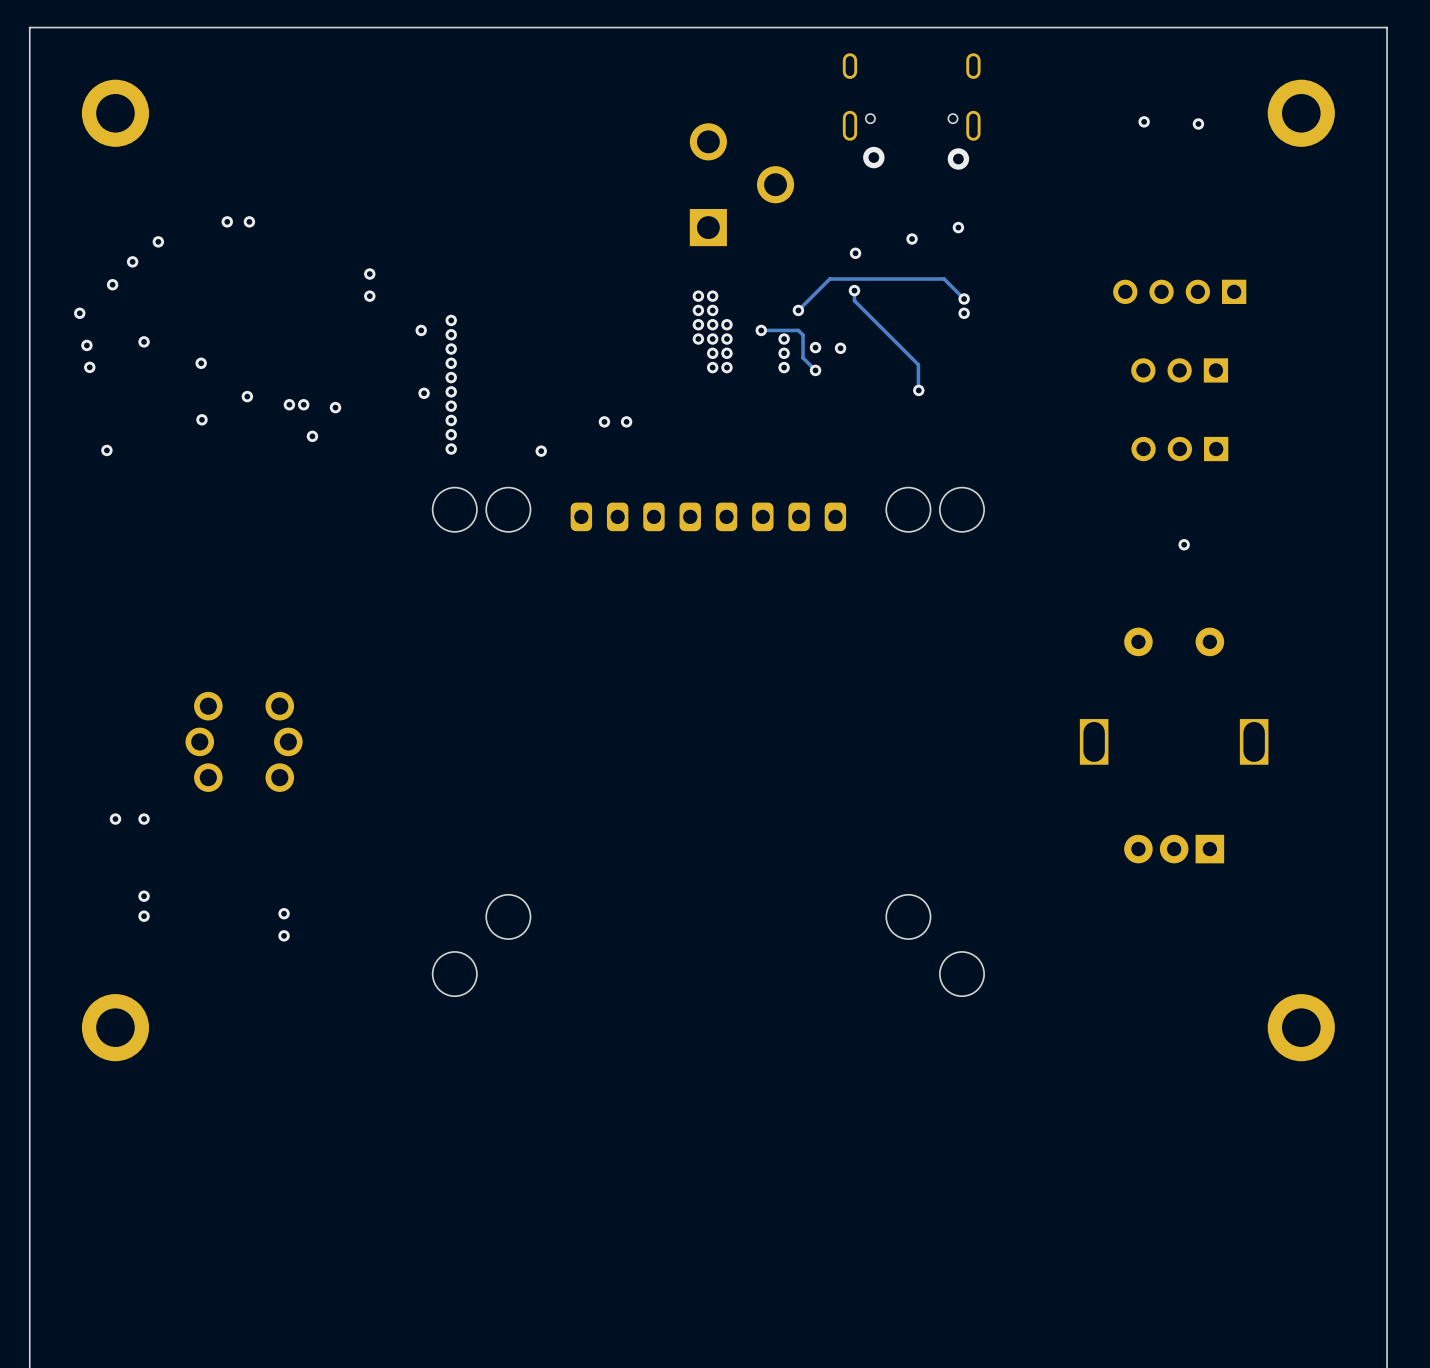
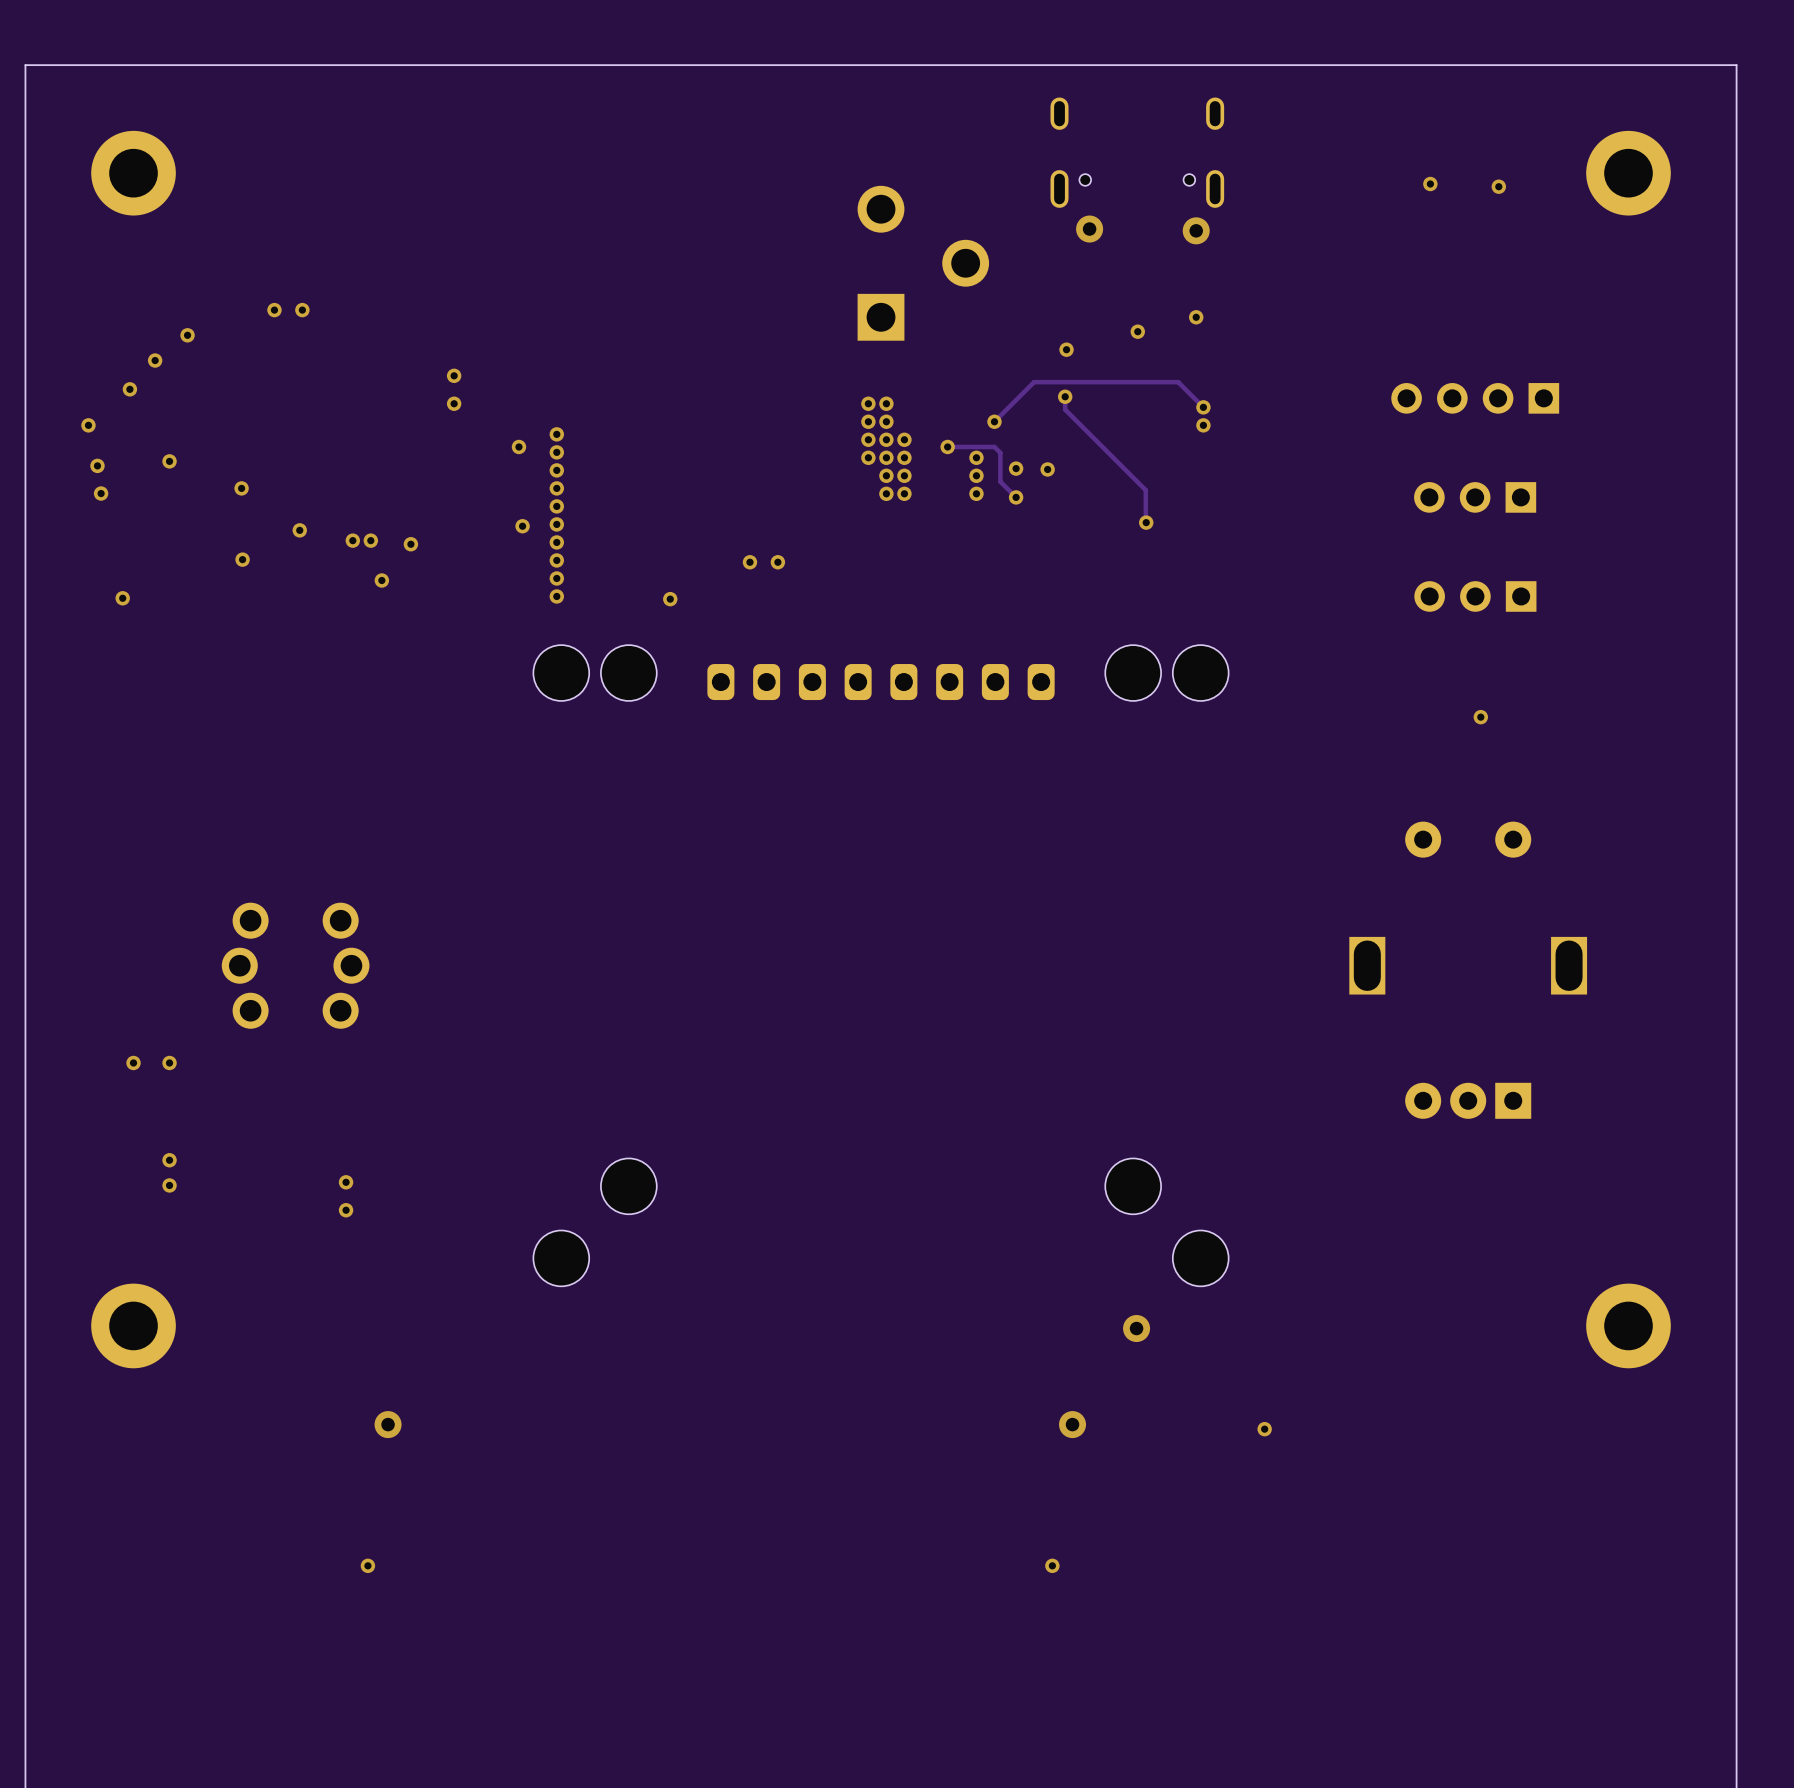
via: none -> (1136, 1328)
via: none -> (388, 1424)
via: none -> (1072, 1424)
via: none -> (1264, 1429)
via: none -> (367, 1565)
via: none -> (1052, 1565)

